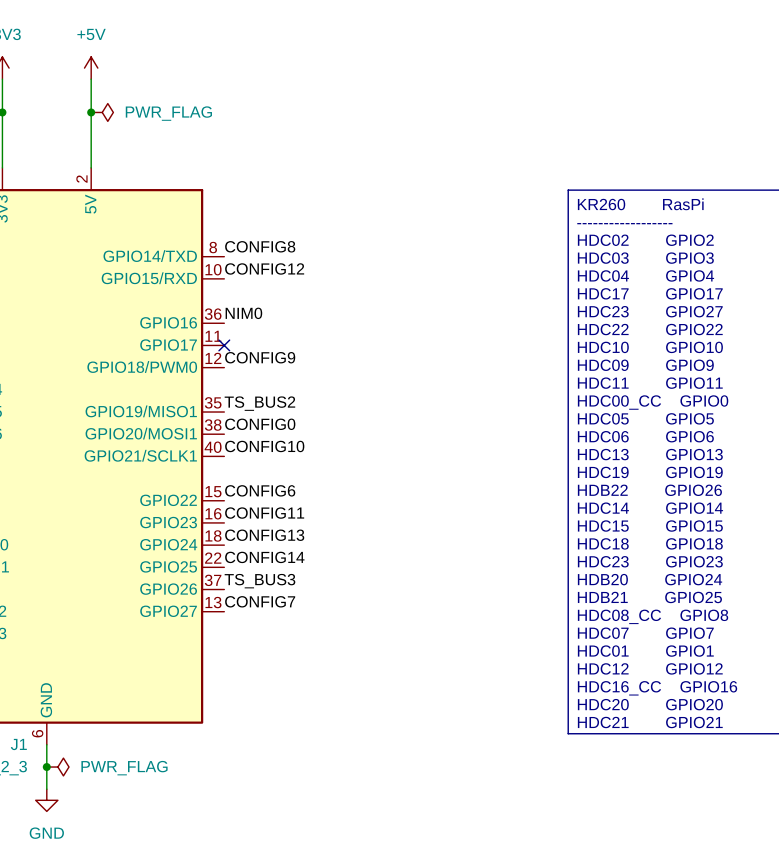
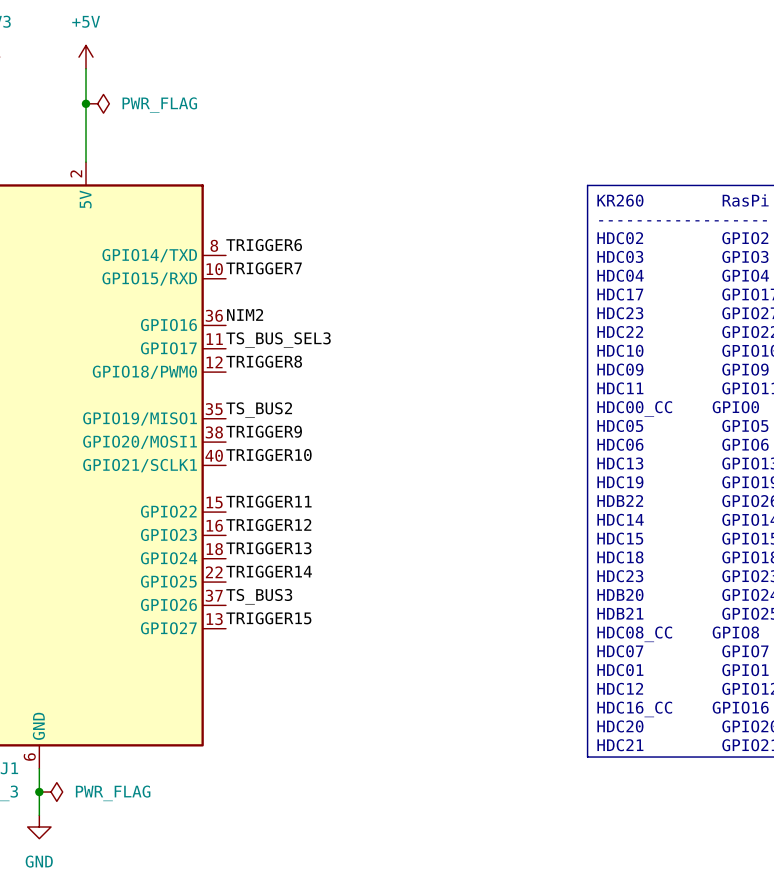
label: CONFIG8 (260, 246) -> TRIGGER6 (264, 245)
label: CONFIG12 (264, 268) -> TRIGGER7 (264, 268)
label: NIM0 (243, 313) -> NIM2 (245, 314)
label: none -> TS_BUS_SEL3 (278, 340)
no-connect mark: (224, 345) -> none
label: CONFIG9 (260, 357) -> TRIGGER8 (264, 361)
label: CONFIG0 (260, 424) -> TRIGGER9 (264, 431)
label: CONFIG10 (264, 446) -> TRIGGER10 (268, 455)
label: CONFIG6 (260, 490) -> TRIGGER11 (268, 501)
label: CONFIG11 (264, 513) -> TRIGGER12 (268, 524)
label: CONFIG13 (264, 535) -> TRIGGER13 (268, 548)
label: CONFIG14 (264, 557) -> TRIGGER14 (269, 571)
label: CONFIG7 (260, 601) -> TRIGGER15 (268, 618)

